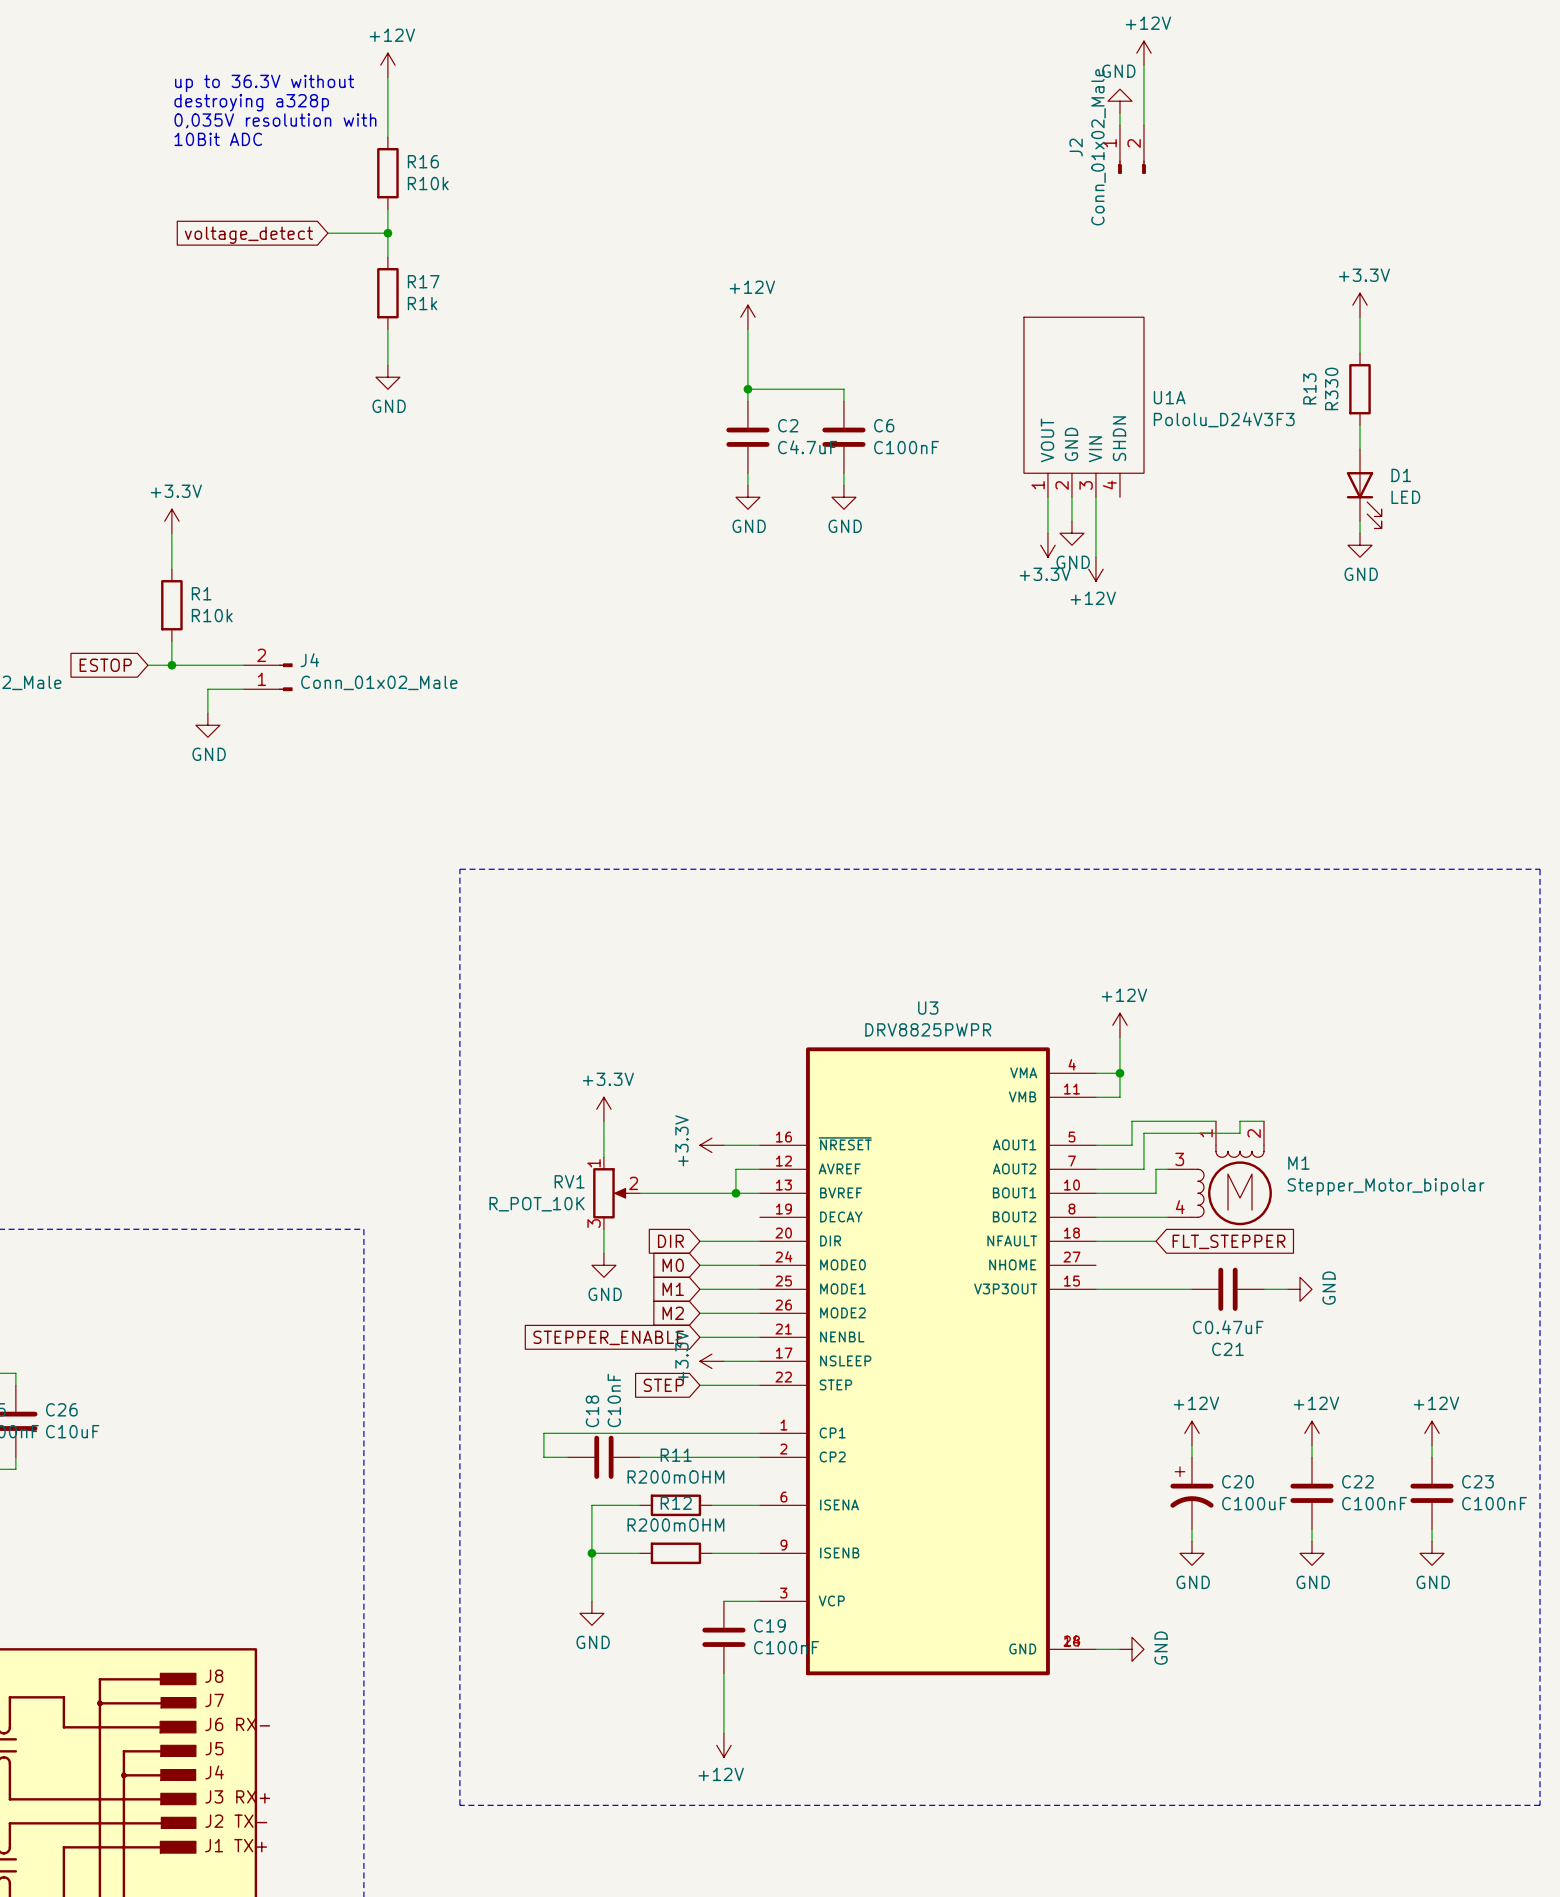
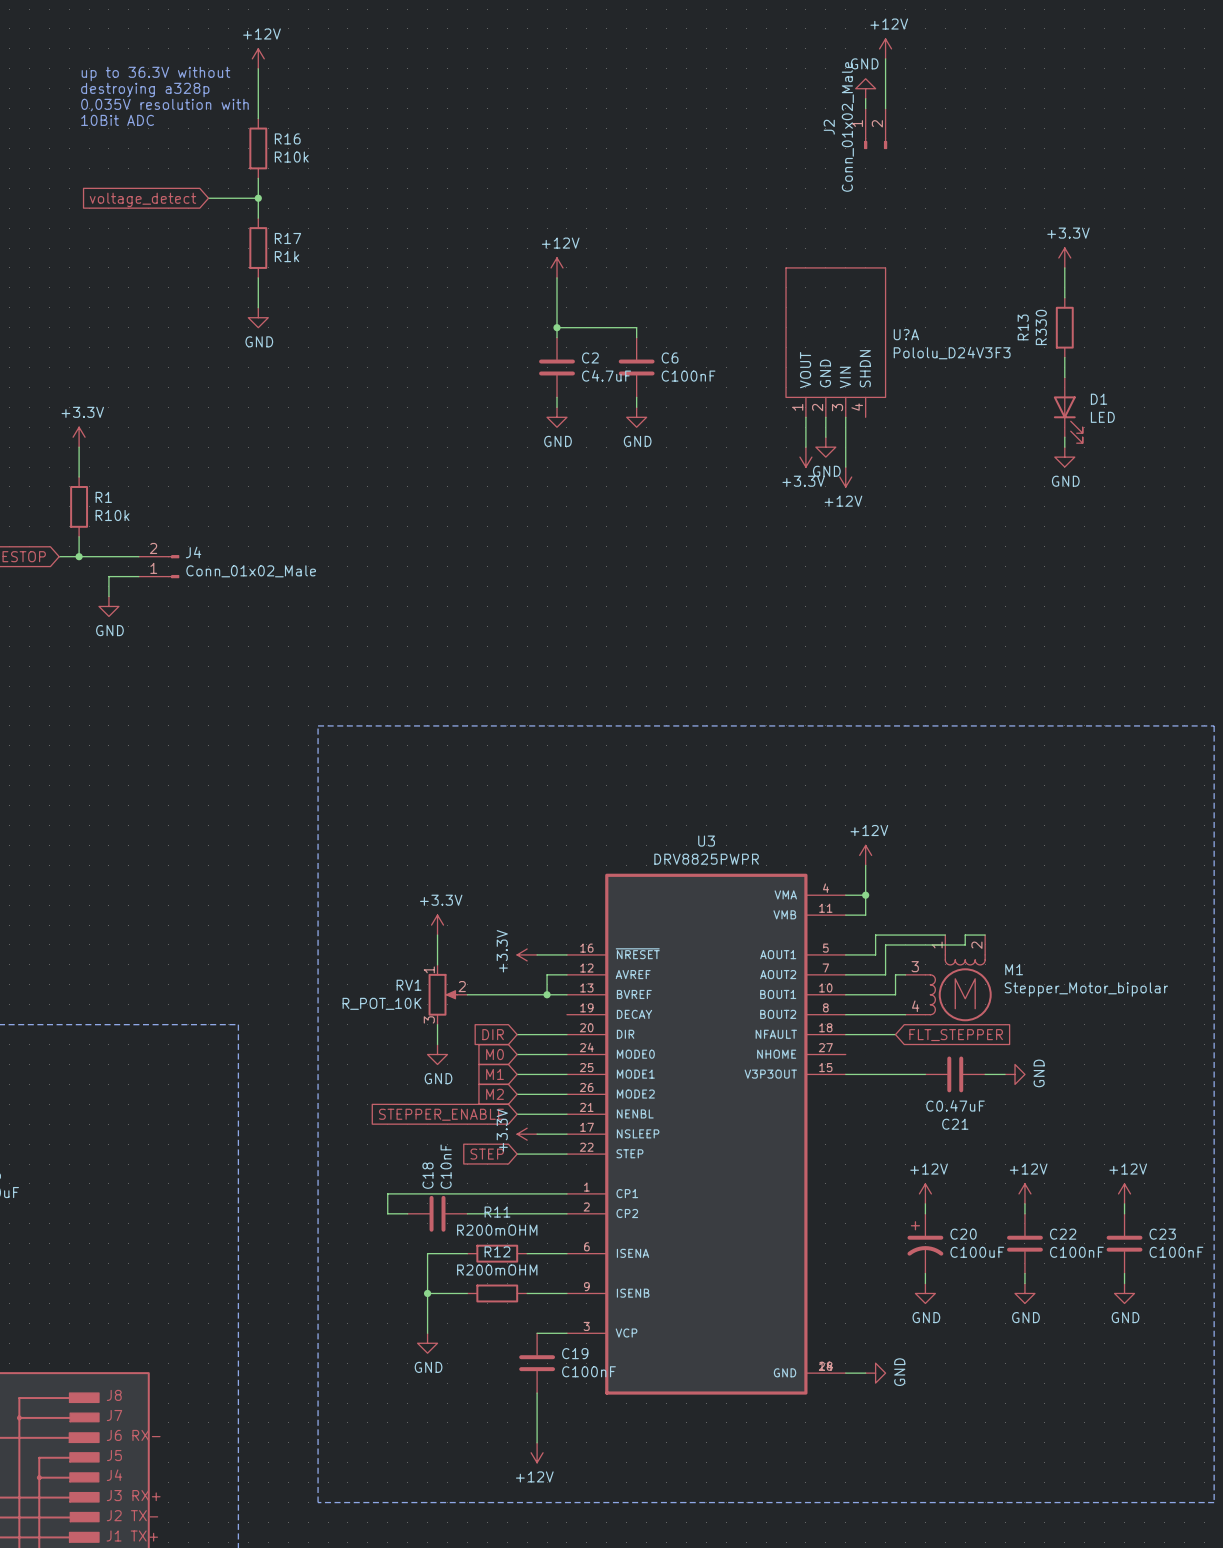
U1A name: U1A (1169, 397) -> U?A (906, 334)

